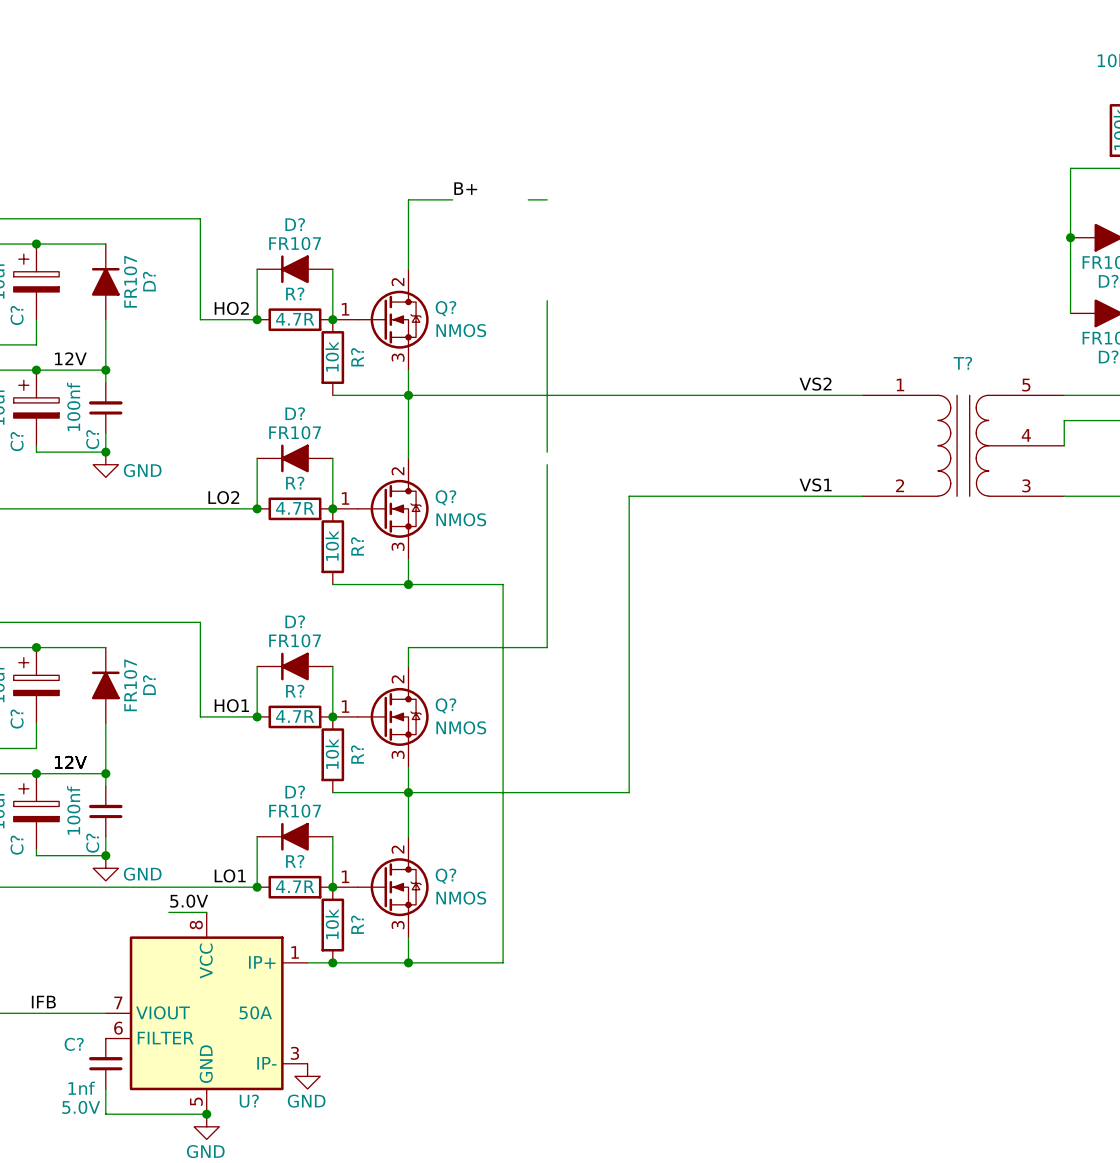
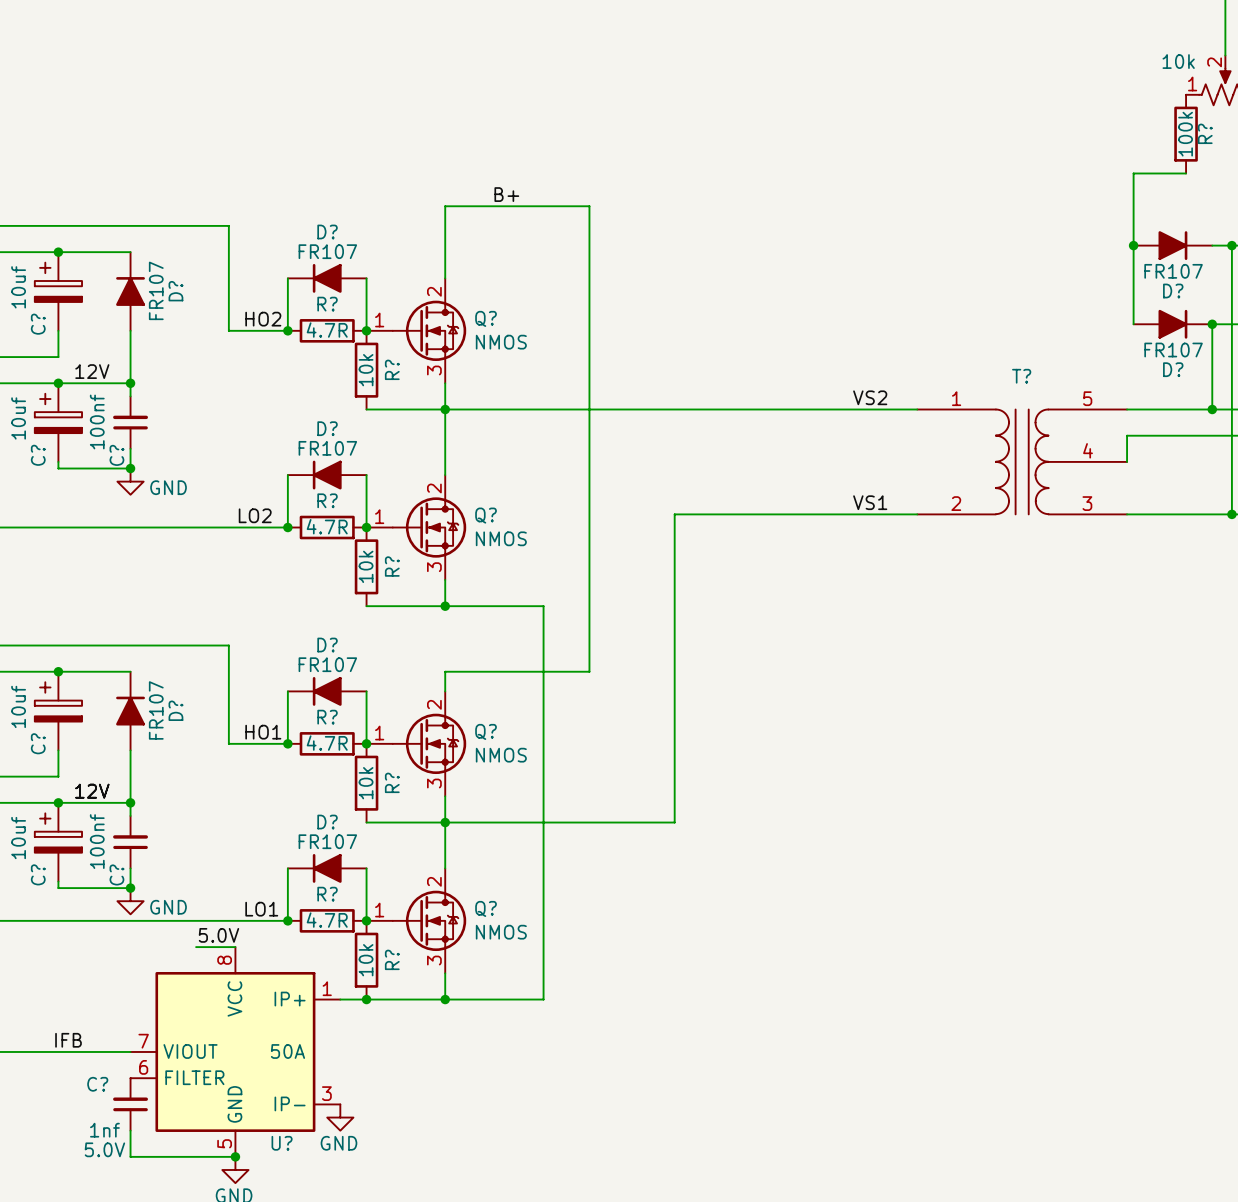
wire: none -> (491, 206) (569, 206)
wire: none -> (589, 206) (589, 311)
wire: none -> (589, 468) (589, 481)

